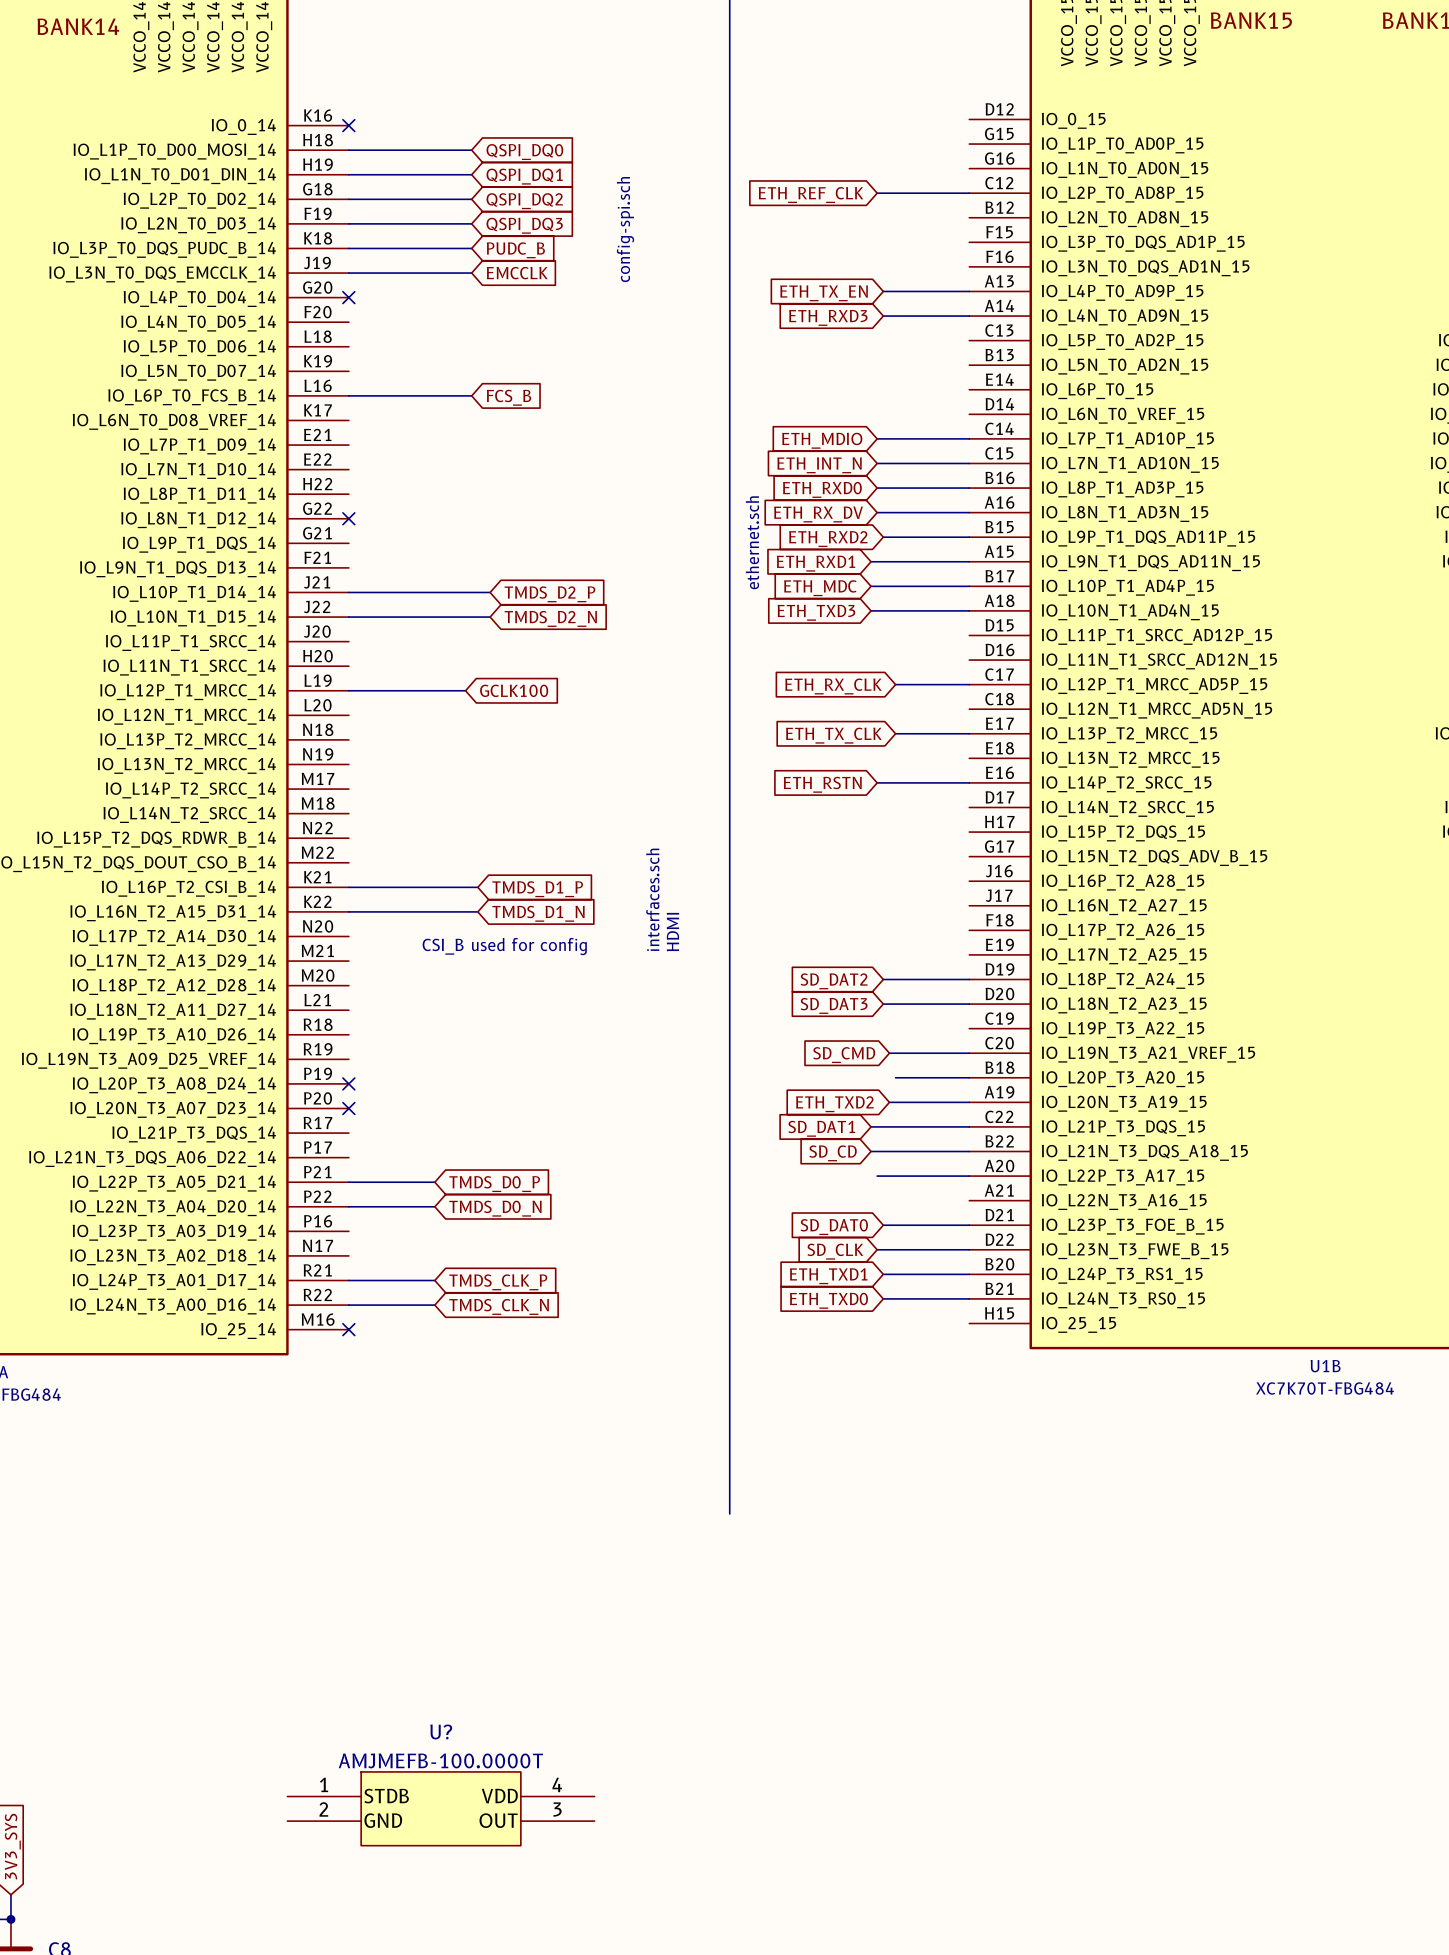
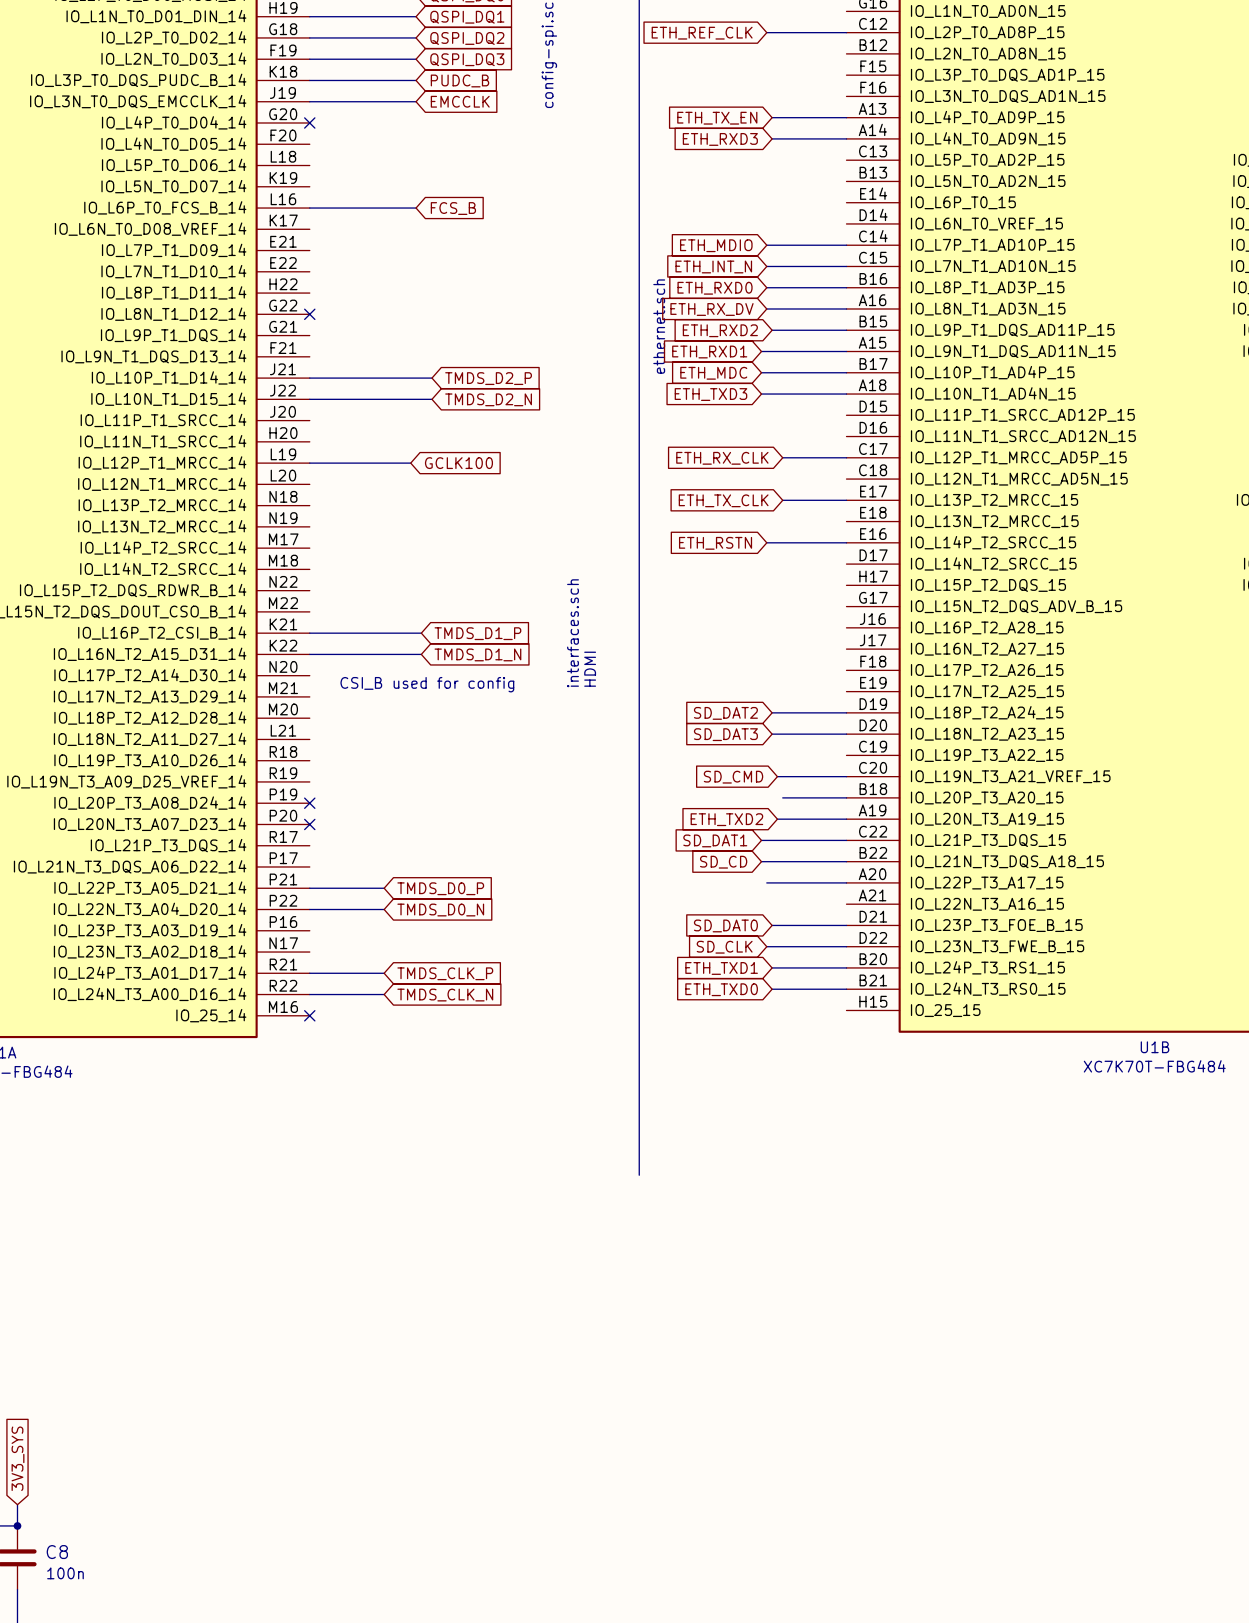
U?: AMJMEFB-100.0000T (441, 1808) -> none

